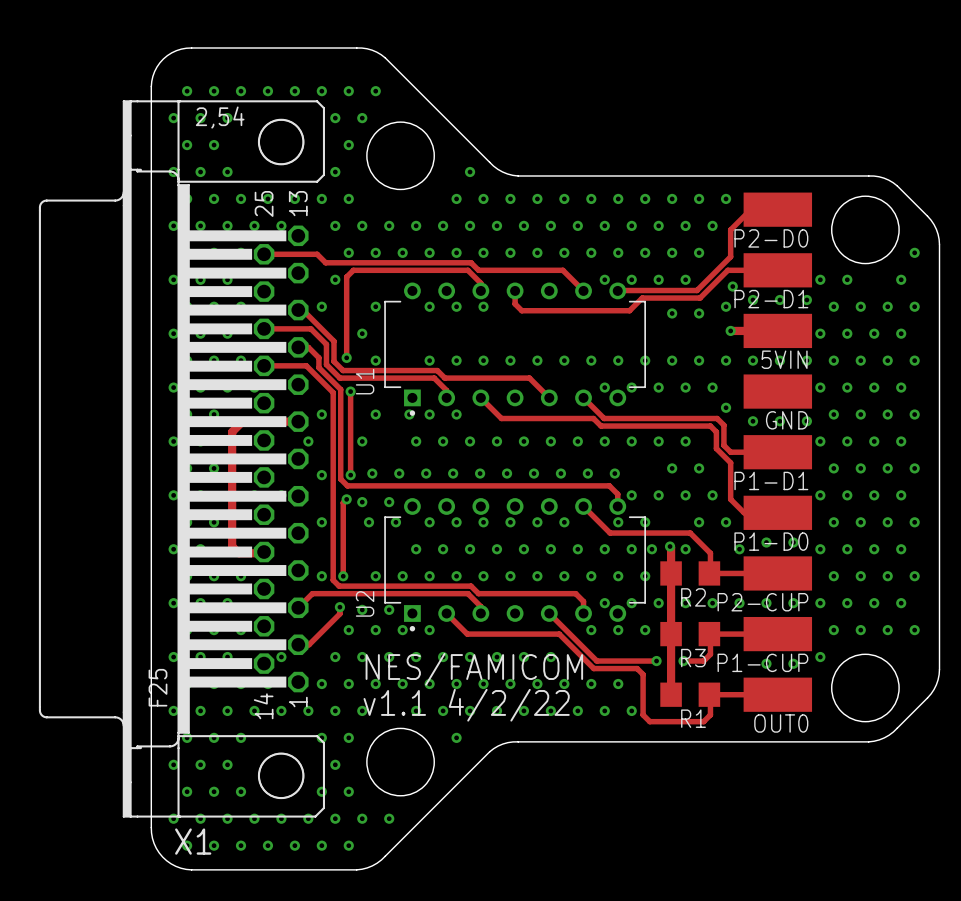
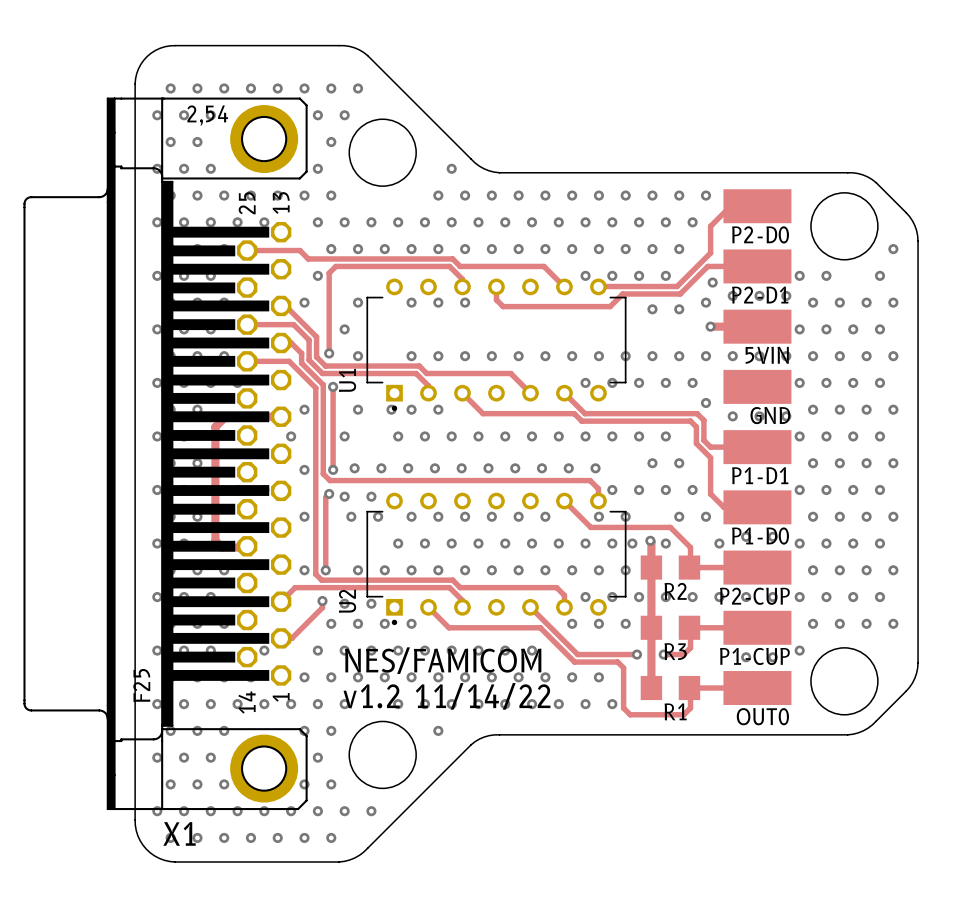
X1 footprint: [38, 100, 326, 818] -> [23, 97, 308, 811]
text: v1.1 4/2/22 (466, 705) -> v1.2 11/14/22 (447, 696)

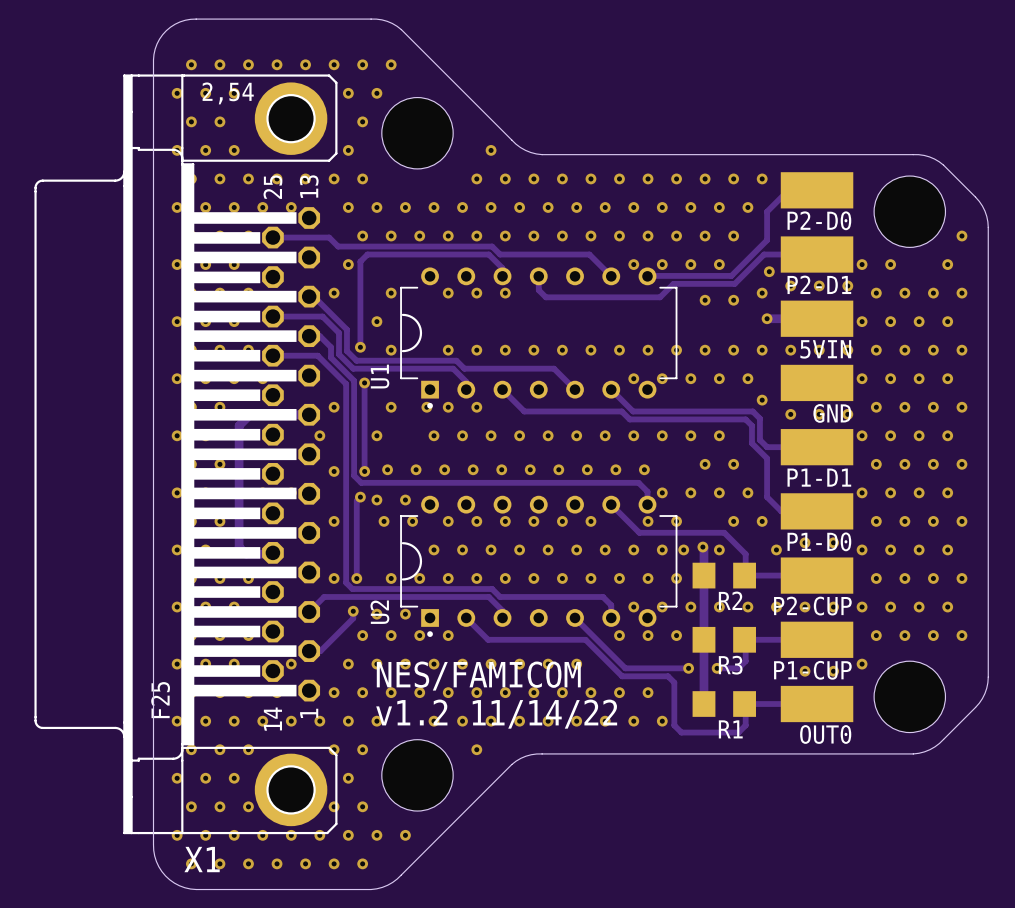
U1 footprint: [366, 278, 627, 411] -> [400, 267, 678, 409]
U2 footprint: [366, 492, 627, 626] -> [400, 495, 678, 637]

